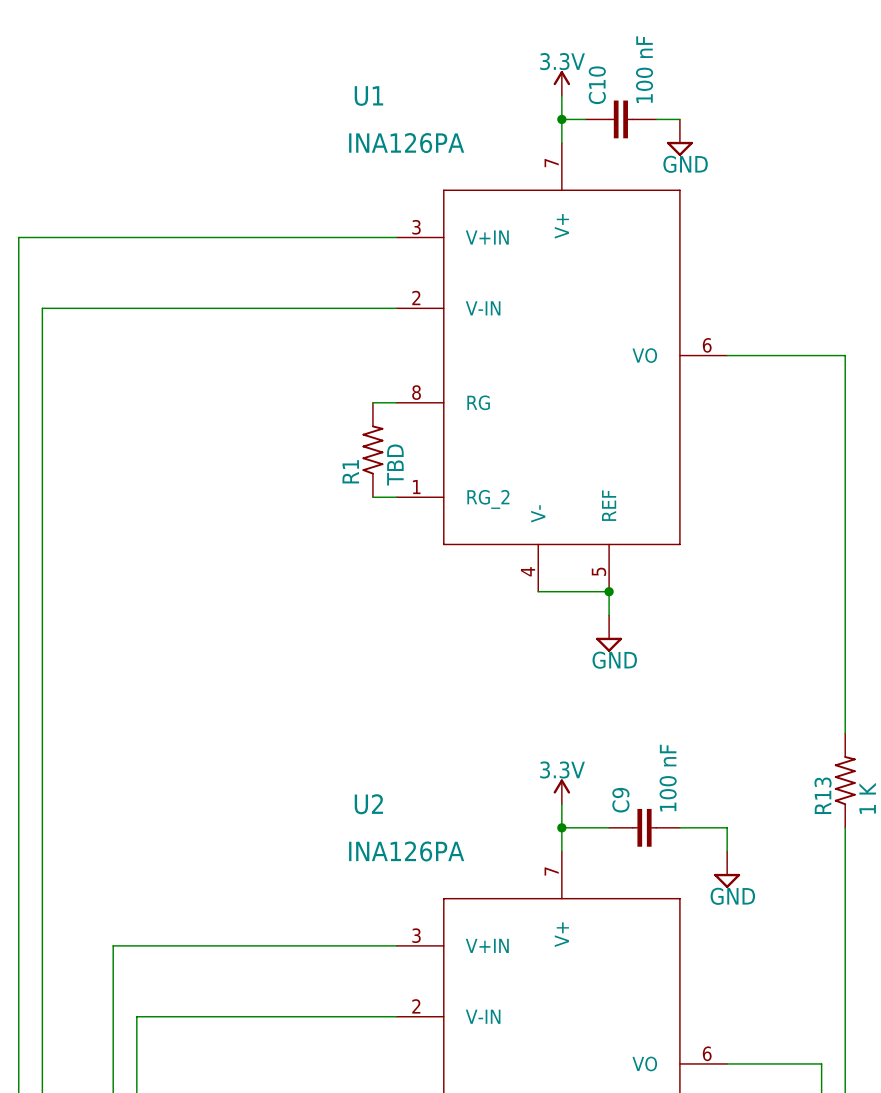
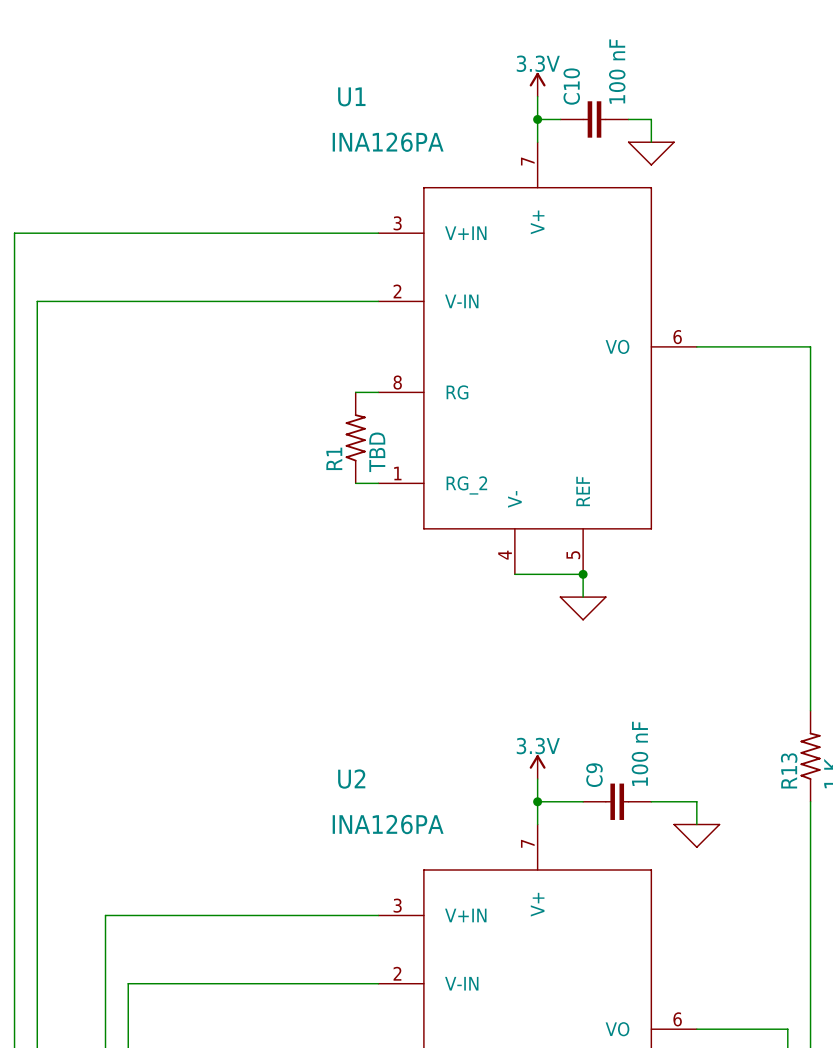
power symbol: GND (679, 137) -> none
power symbol: none -> (651, 153)
power symbol shape: [596, 615, 623, 652] -> [559, 596, 607, 621]
power symbol text: GND (614, 660) -> none
power symbol shape: [714, 851, 741, 889] -> [673, 823, 721, 848]
power symbol text: GND (732, 896) -> none

